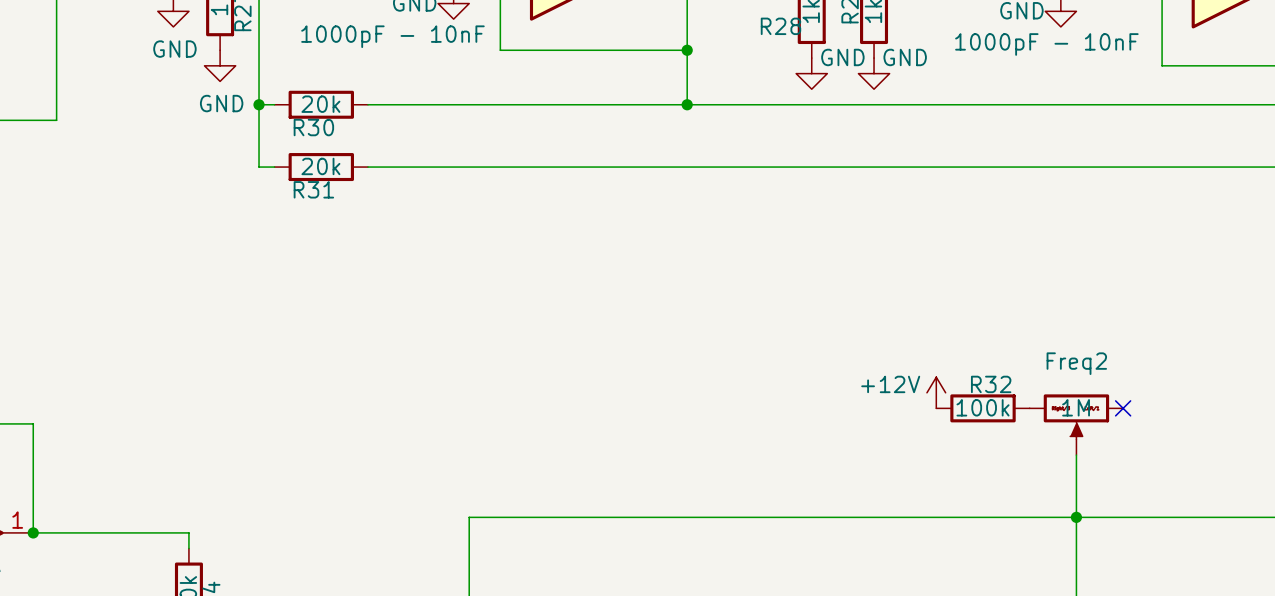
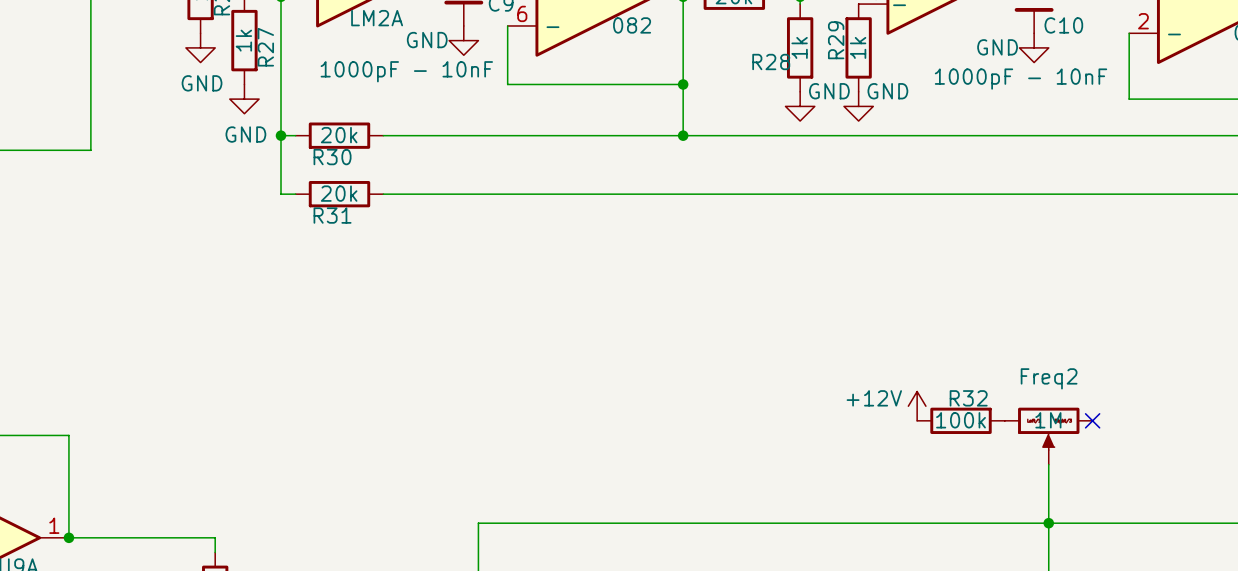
Freq2 flip: as is (1076, 416) -> left-right (1048, 428)

